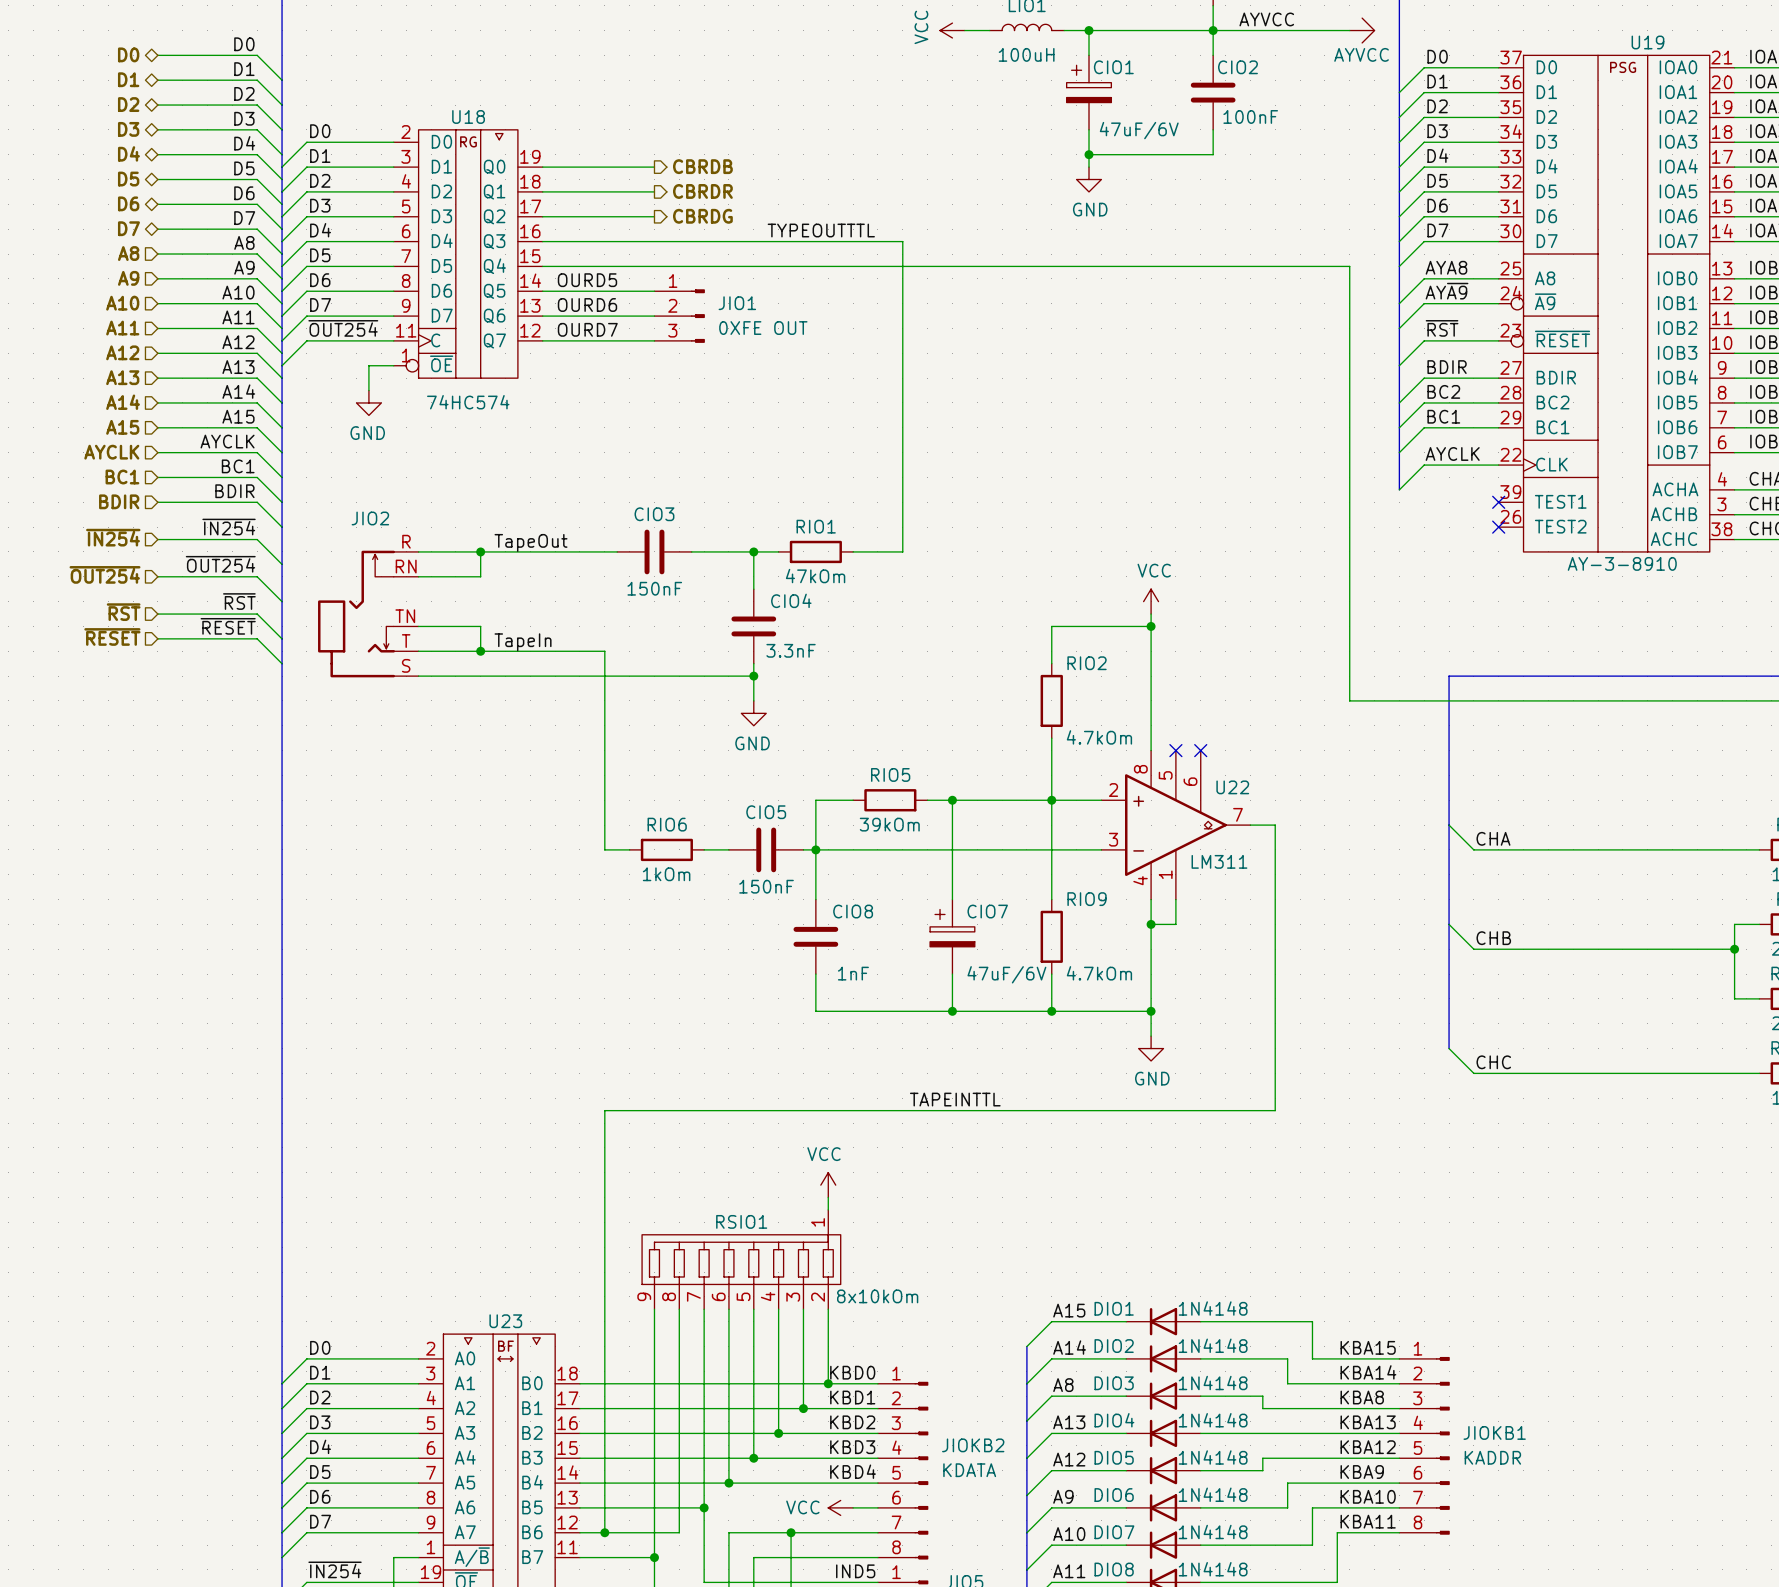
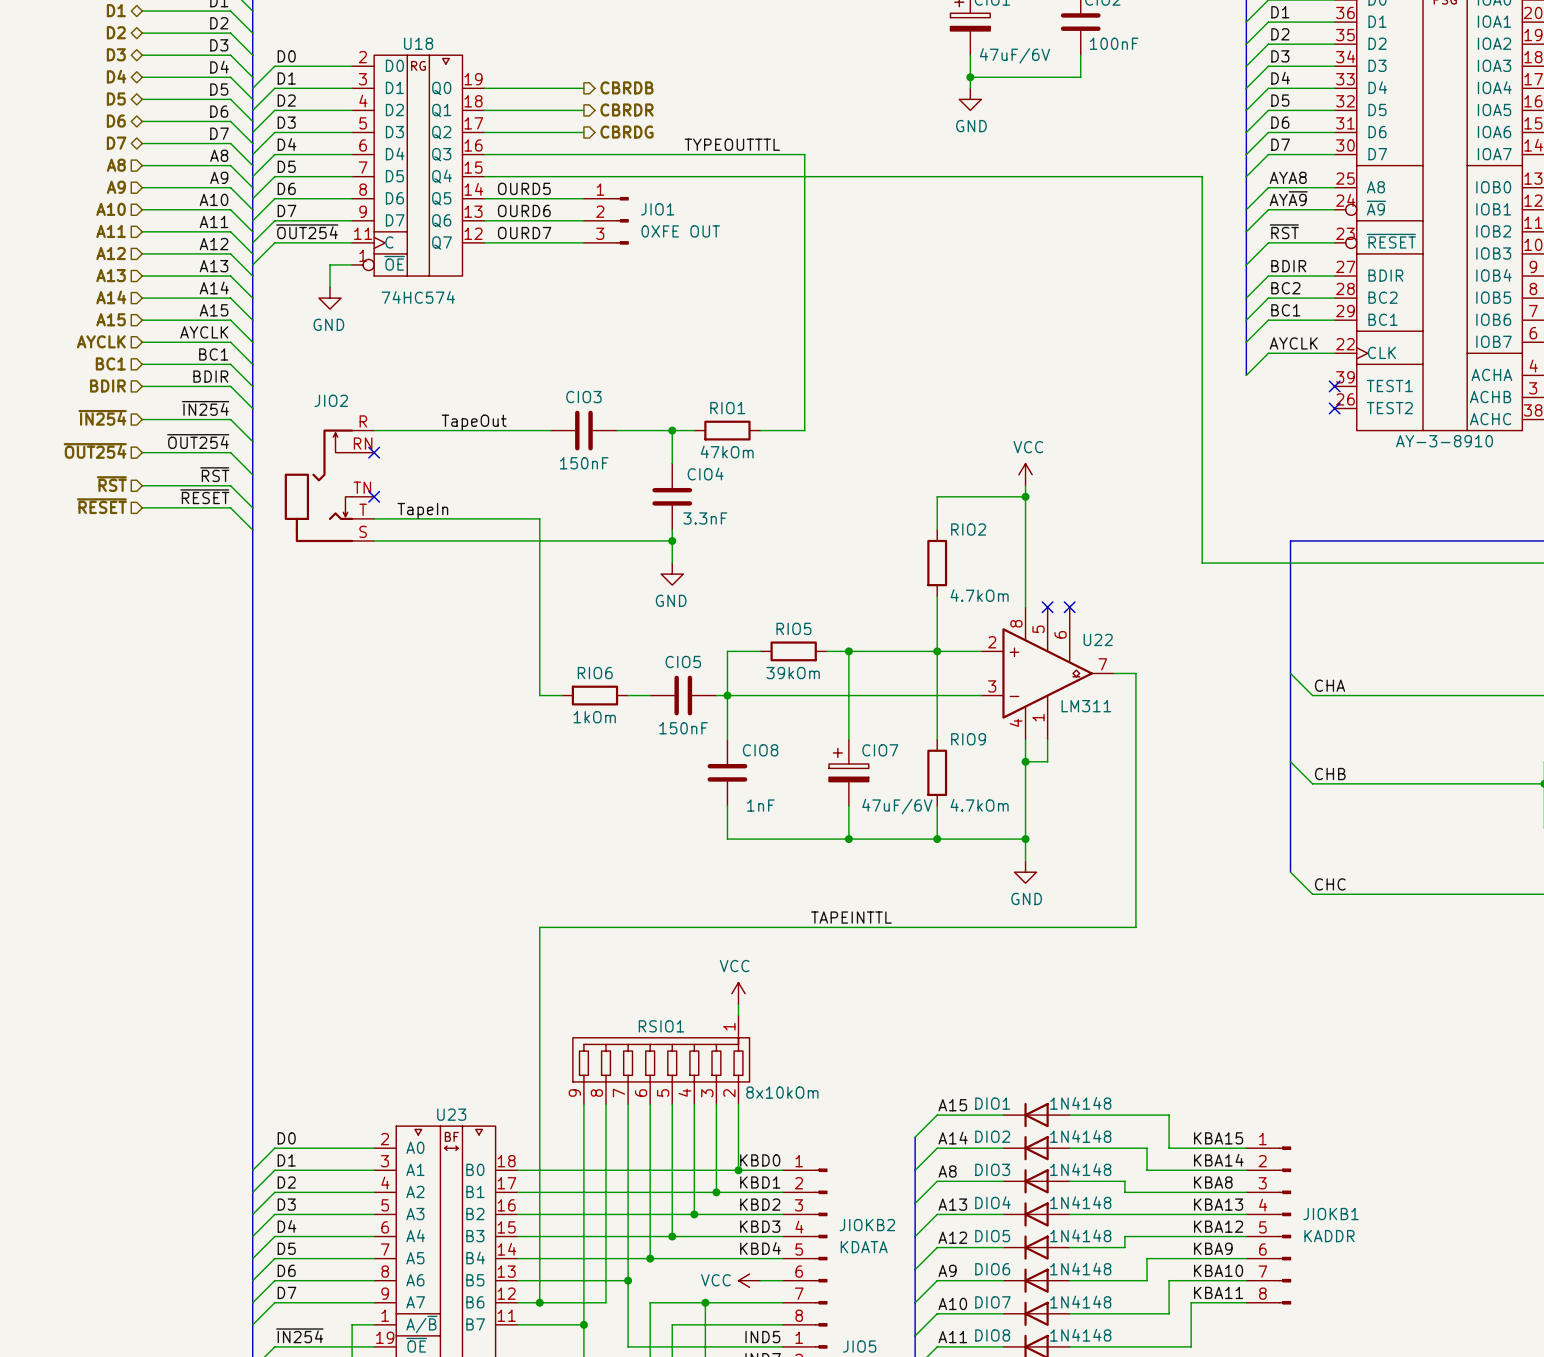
wire: (480, 551) (480, 576) (418, 576) -> none
junction: (480, 551) -> none
no-connect mark: none -> (374, 452)
wire: (418, 626) (480, 626) (480, 651) -> none
no-connect mark: none -> (374, 496)
label position: TapeIn (523, 642) -> TapeIn (422, 510)
junction: (480, 651) -> none

